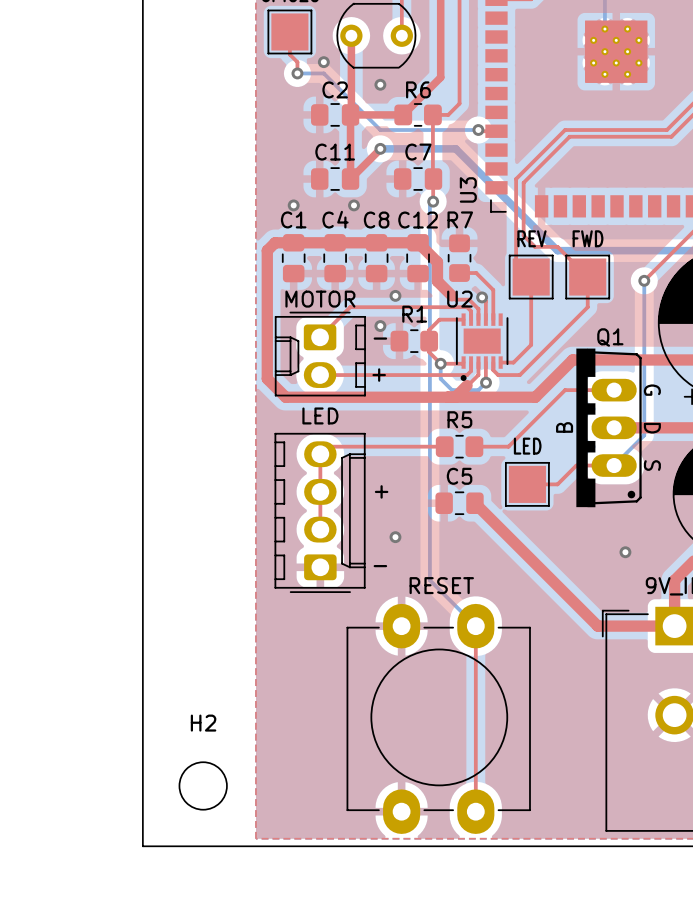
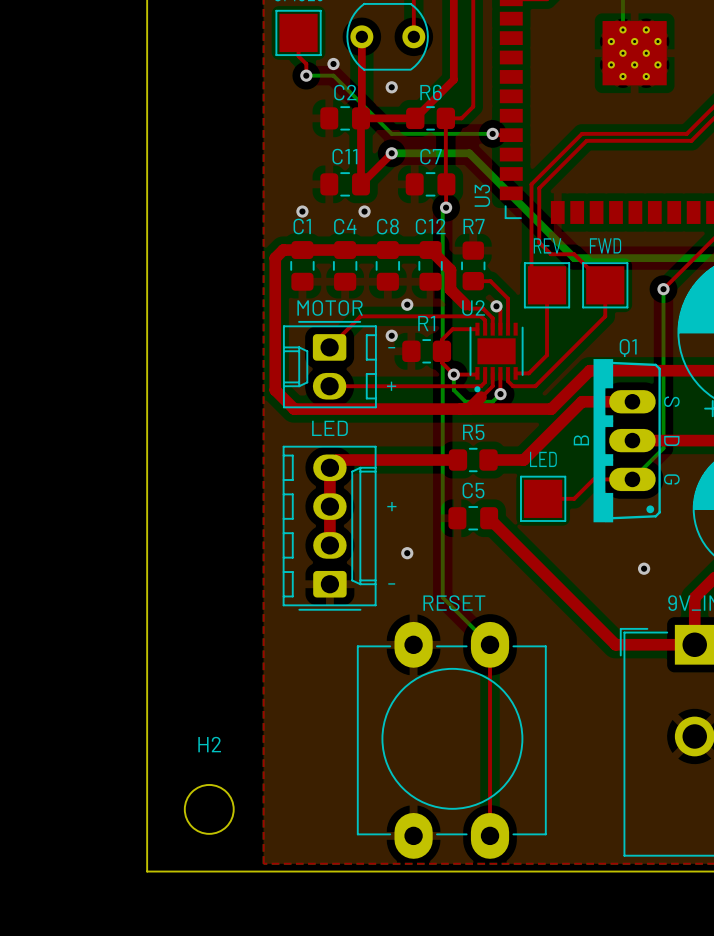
top track width: thin (614, 390) (565, 390) (508, 446) (474, 446) -> thick (632, 401) (581, 401) (523, 460) (488, 460)
Q1 text: G (652, 390) -> S (671, 401)
top track width: thin (444, 446) (327, 446) (320, 453) (320, 529) -> thick (457, 460) (337, 460) (329, 467) (329, 545)
Q1 text: S (652, 465) -> G (671, 479)

